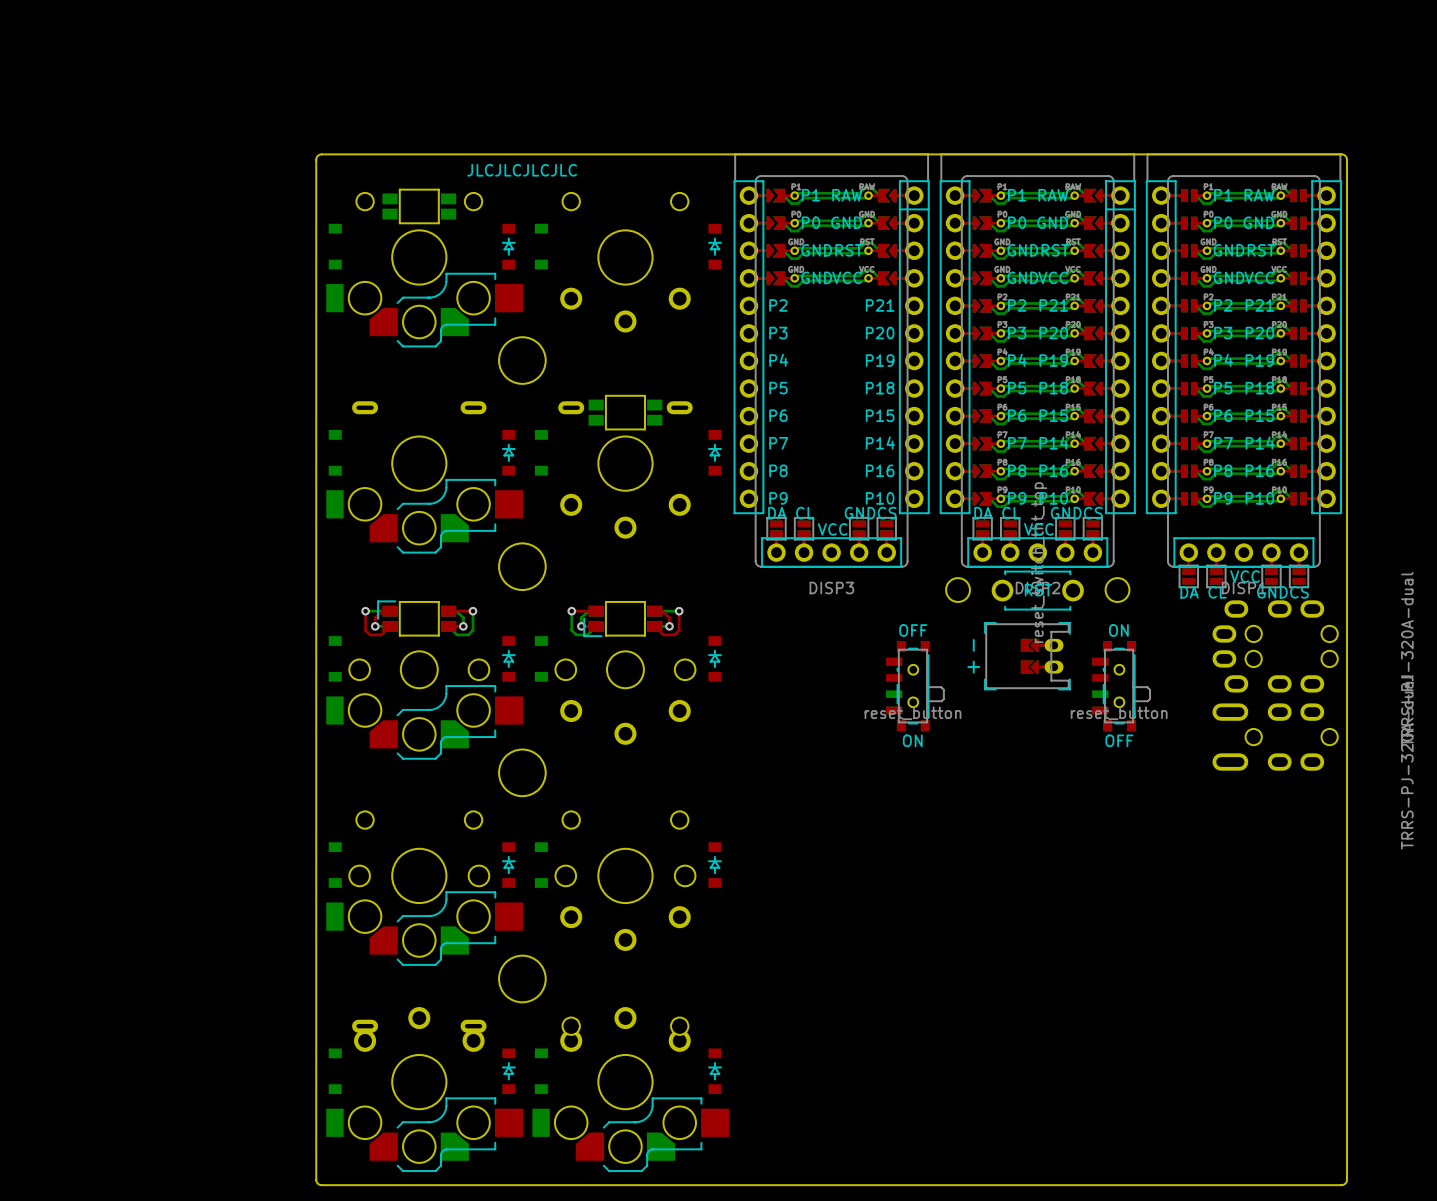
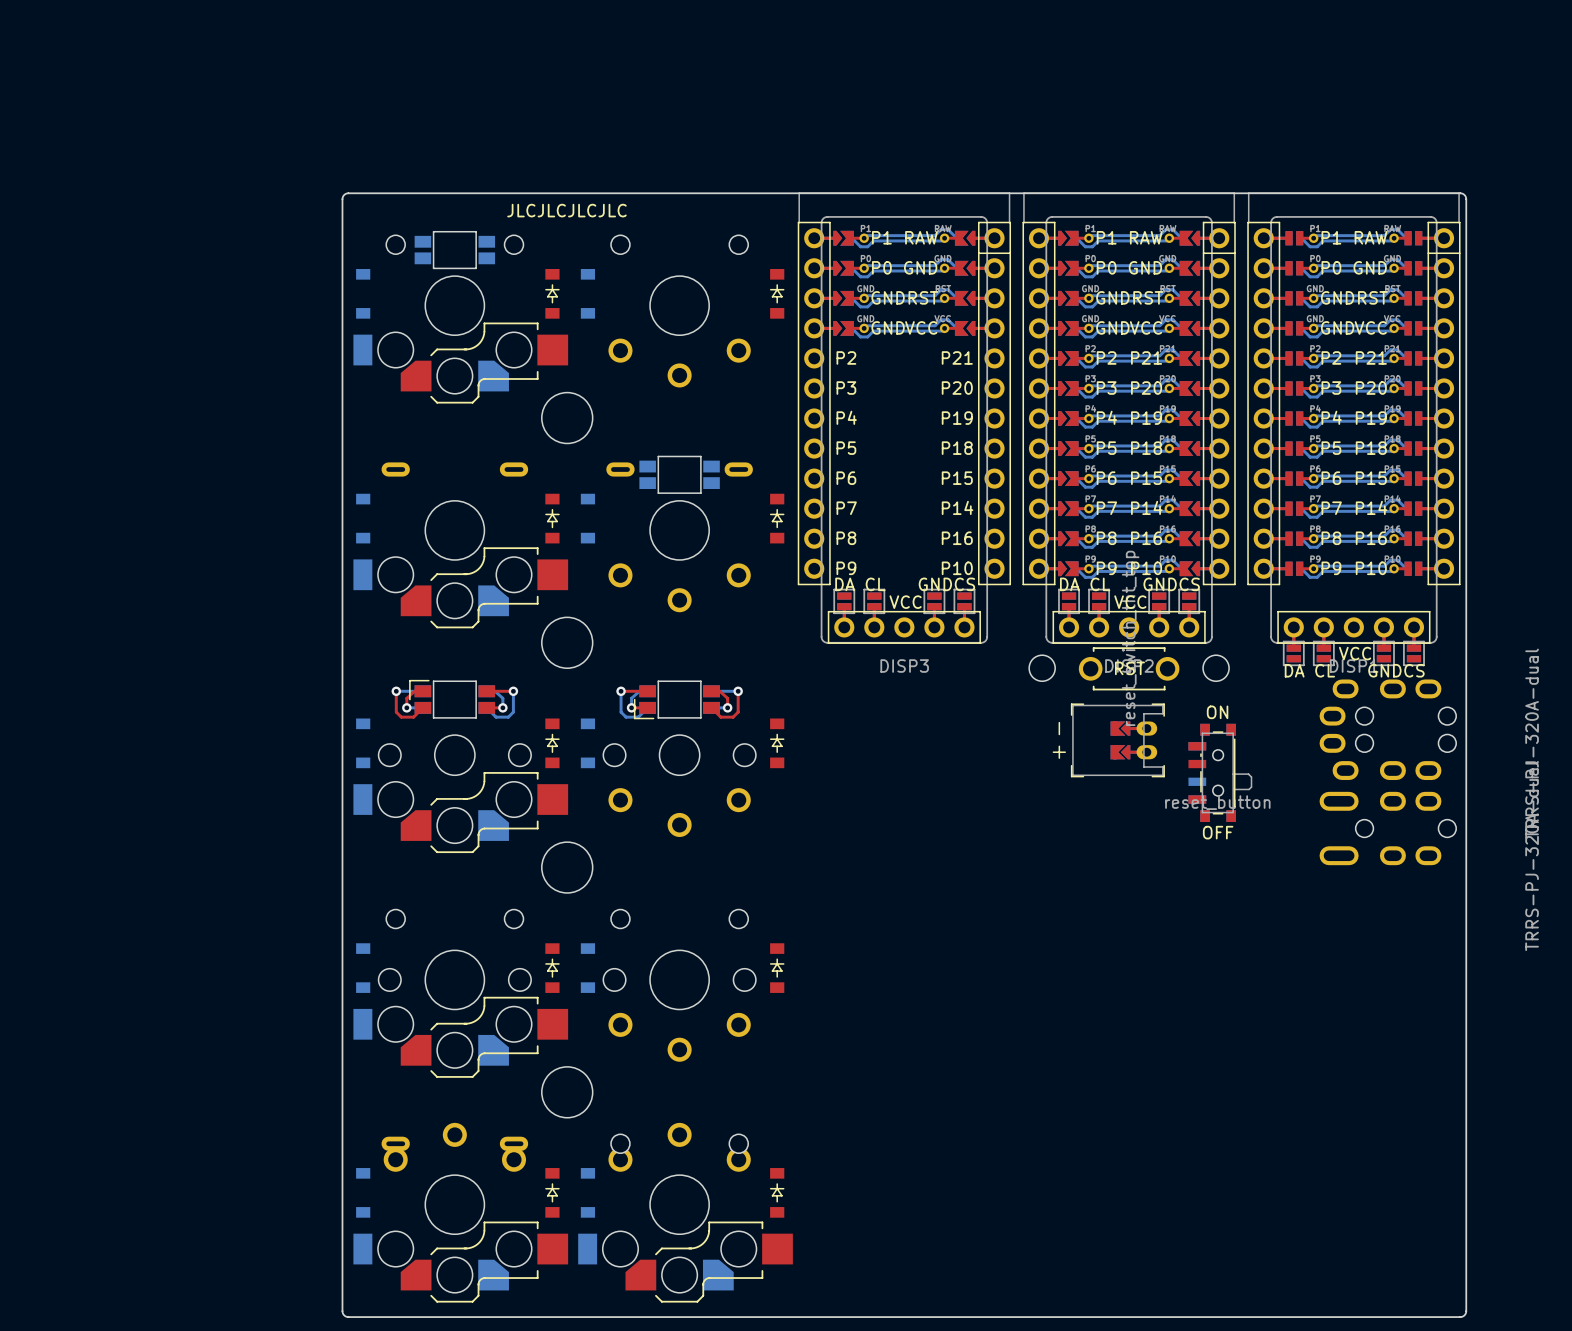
part: reset_button (915, 686) -> none

